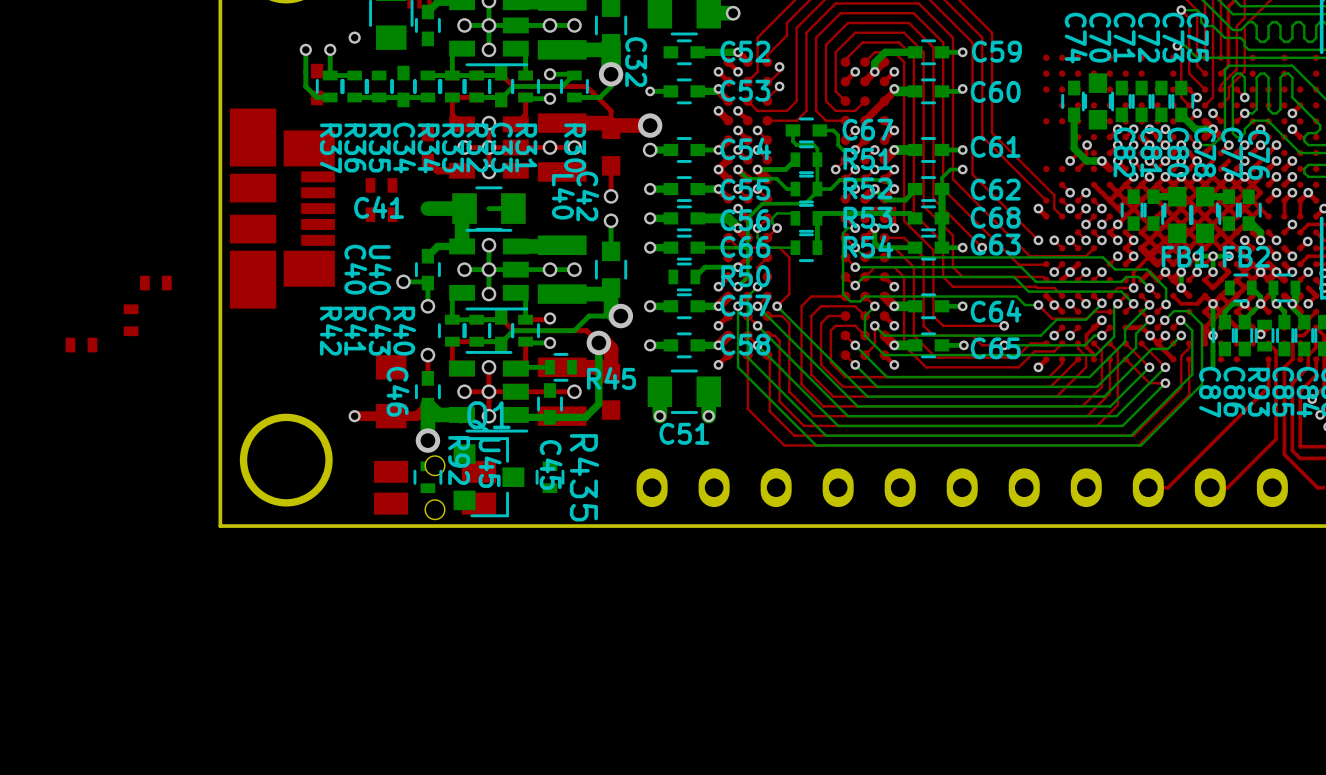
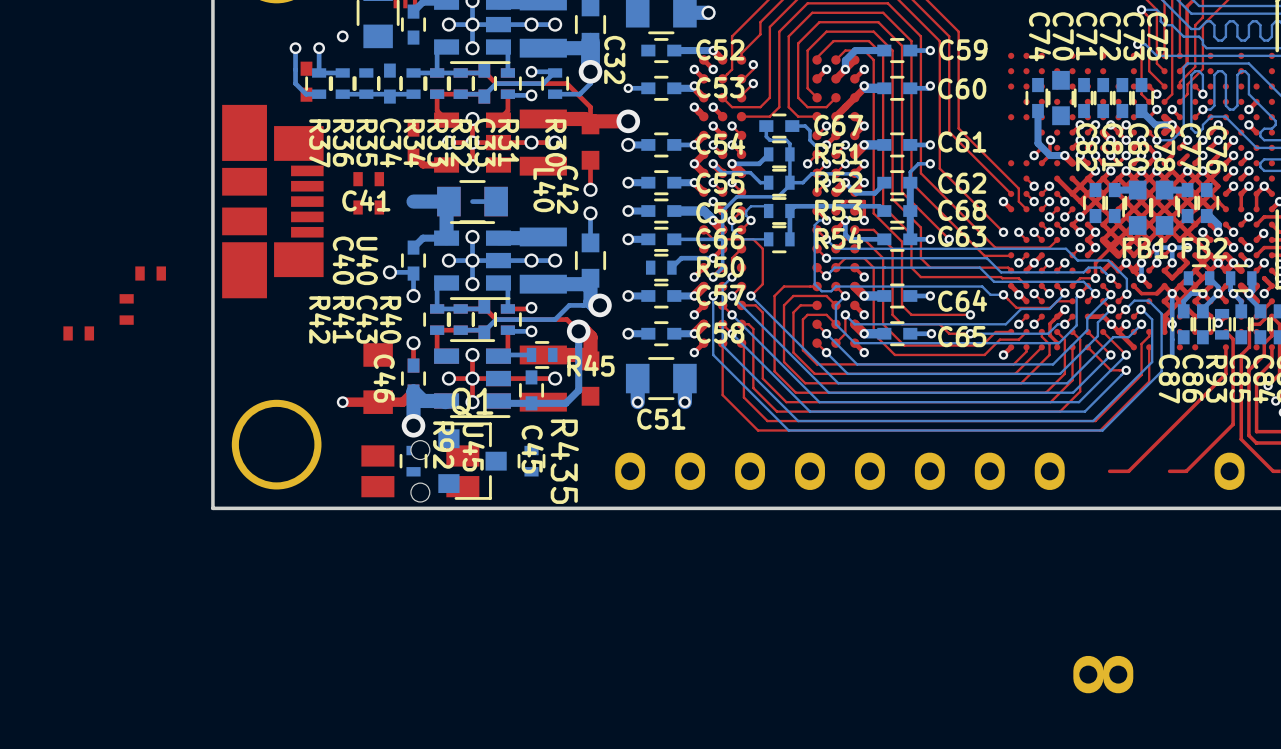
part: (1148, 487) -> none
part: (1210, 487) -> none
part: none -> (1088, 674)
part: none -> (1118, 674)

